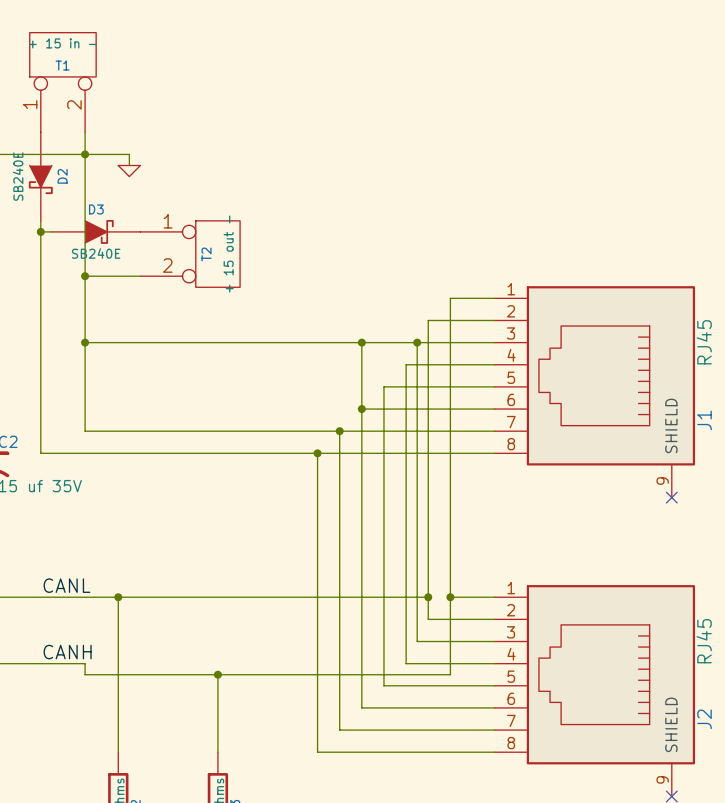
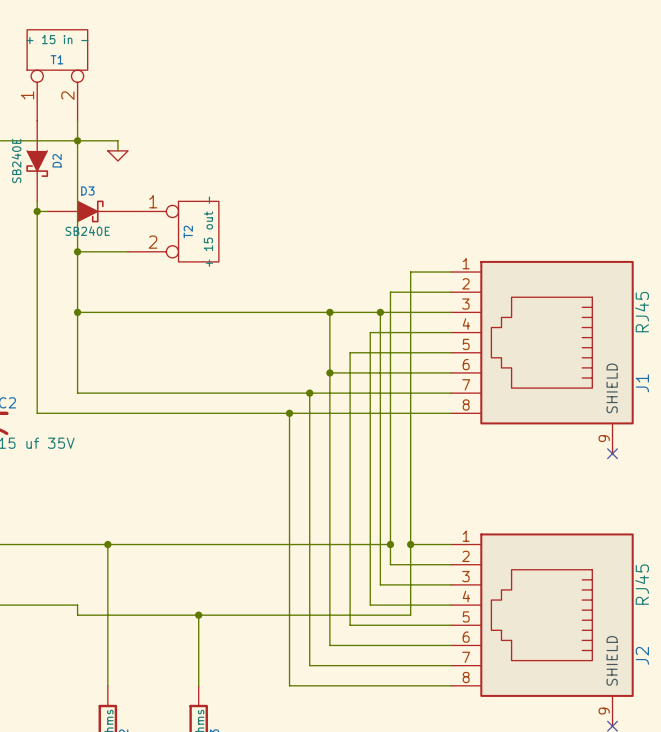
label: CANL (66, 585) -> none
label: CANH (67, 652) -> none

